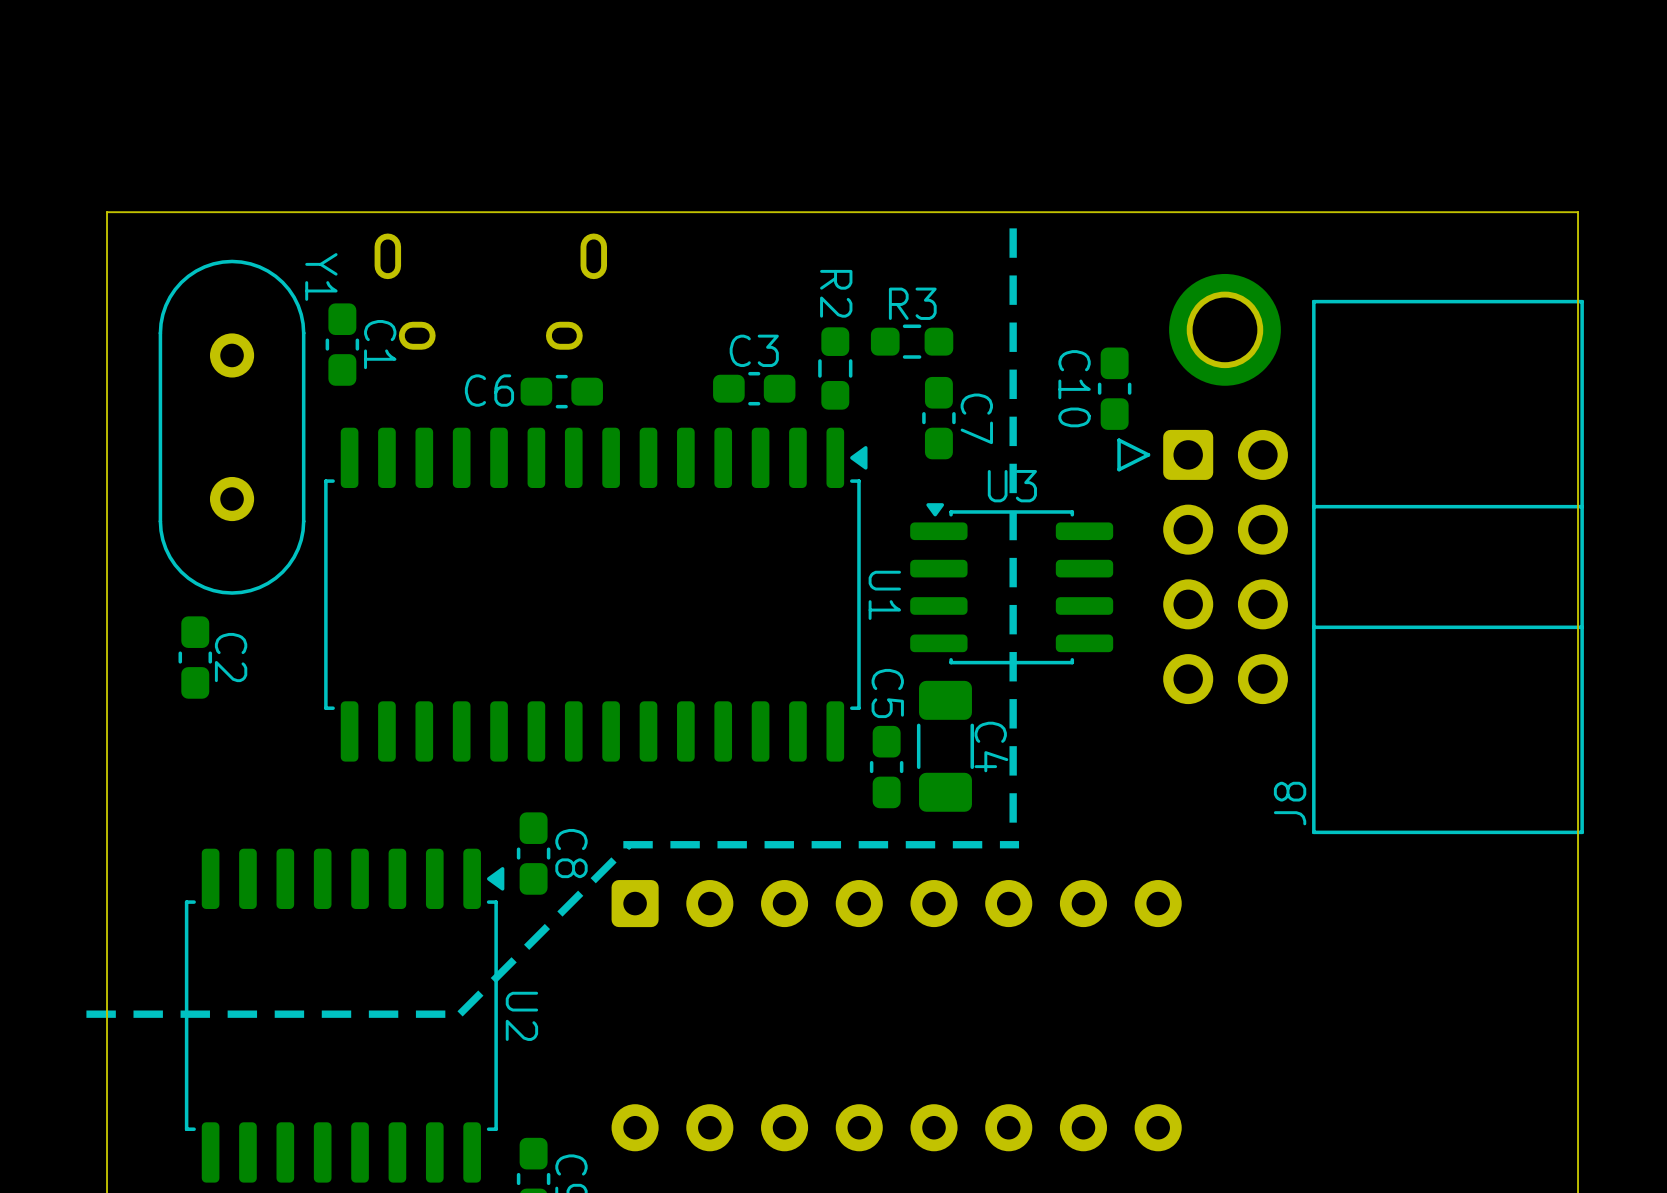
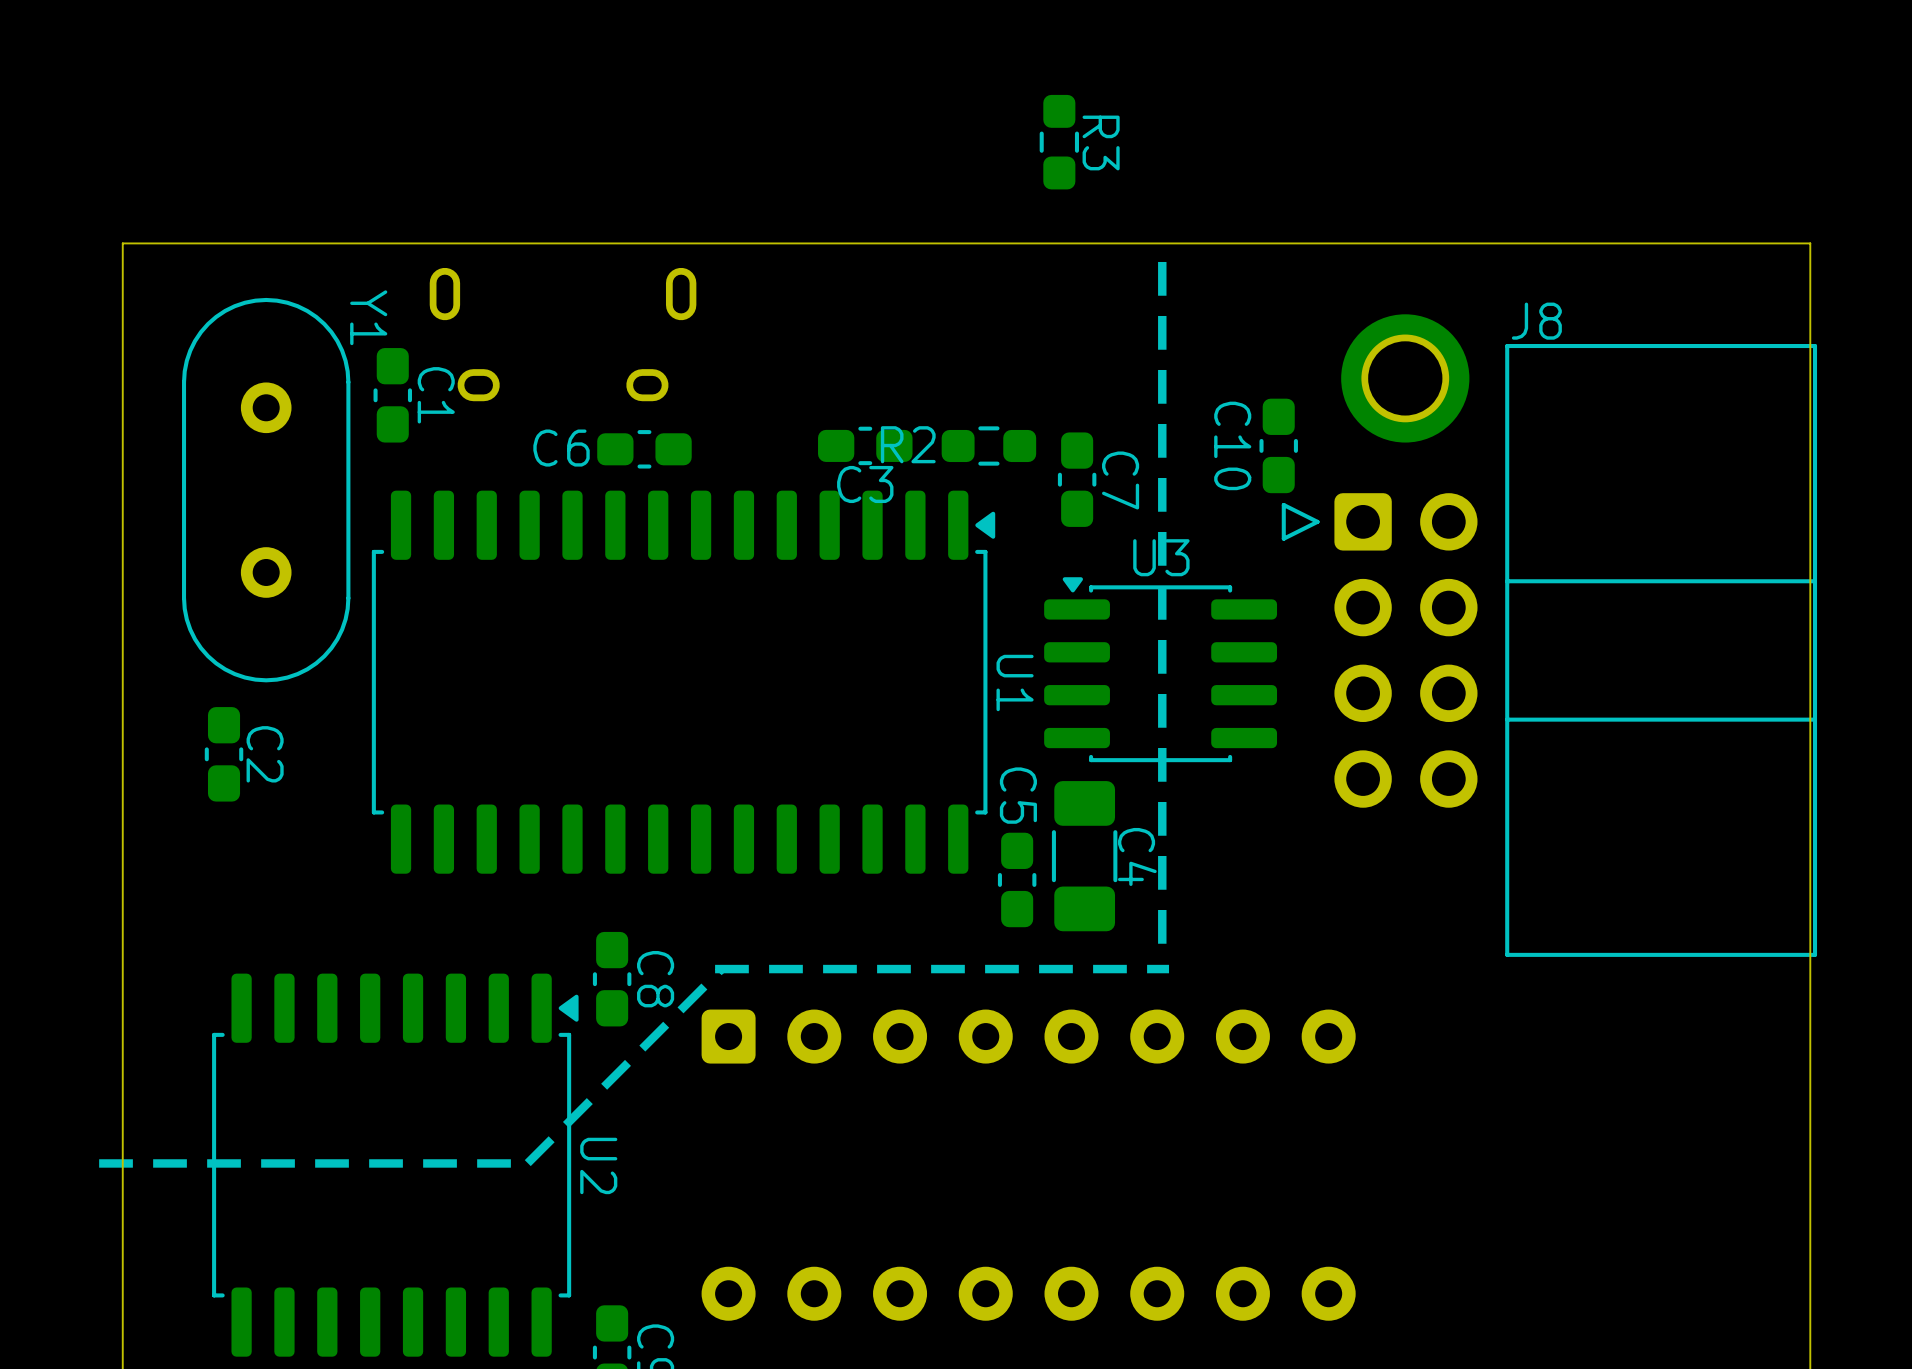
R2 name position: R2 (836, 293) -> R2 (908, 444)
R3 rotation: 0° (912, 341) -> 90° clockwise (1059, 142)
R3 position: (912, 341) -> (1059, 142)
C3 name position: C3 (754, 350) -> C3 (865, 484)
R2 rotation: 0° (835, 368) -> 90° clockwise (988, 446)
J8 name rotation: 0° (1290, 803) -> 90° clockwise (1536, 321)
J8 name position: J8 (1290, 803) -> J8 (1536, 321)

